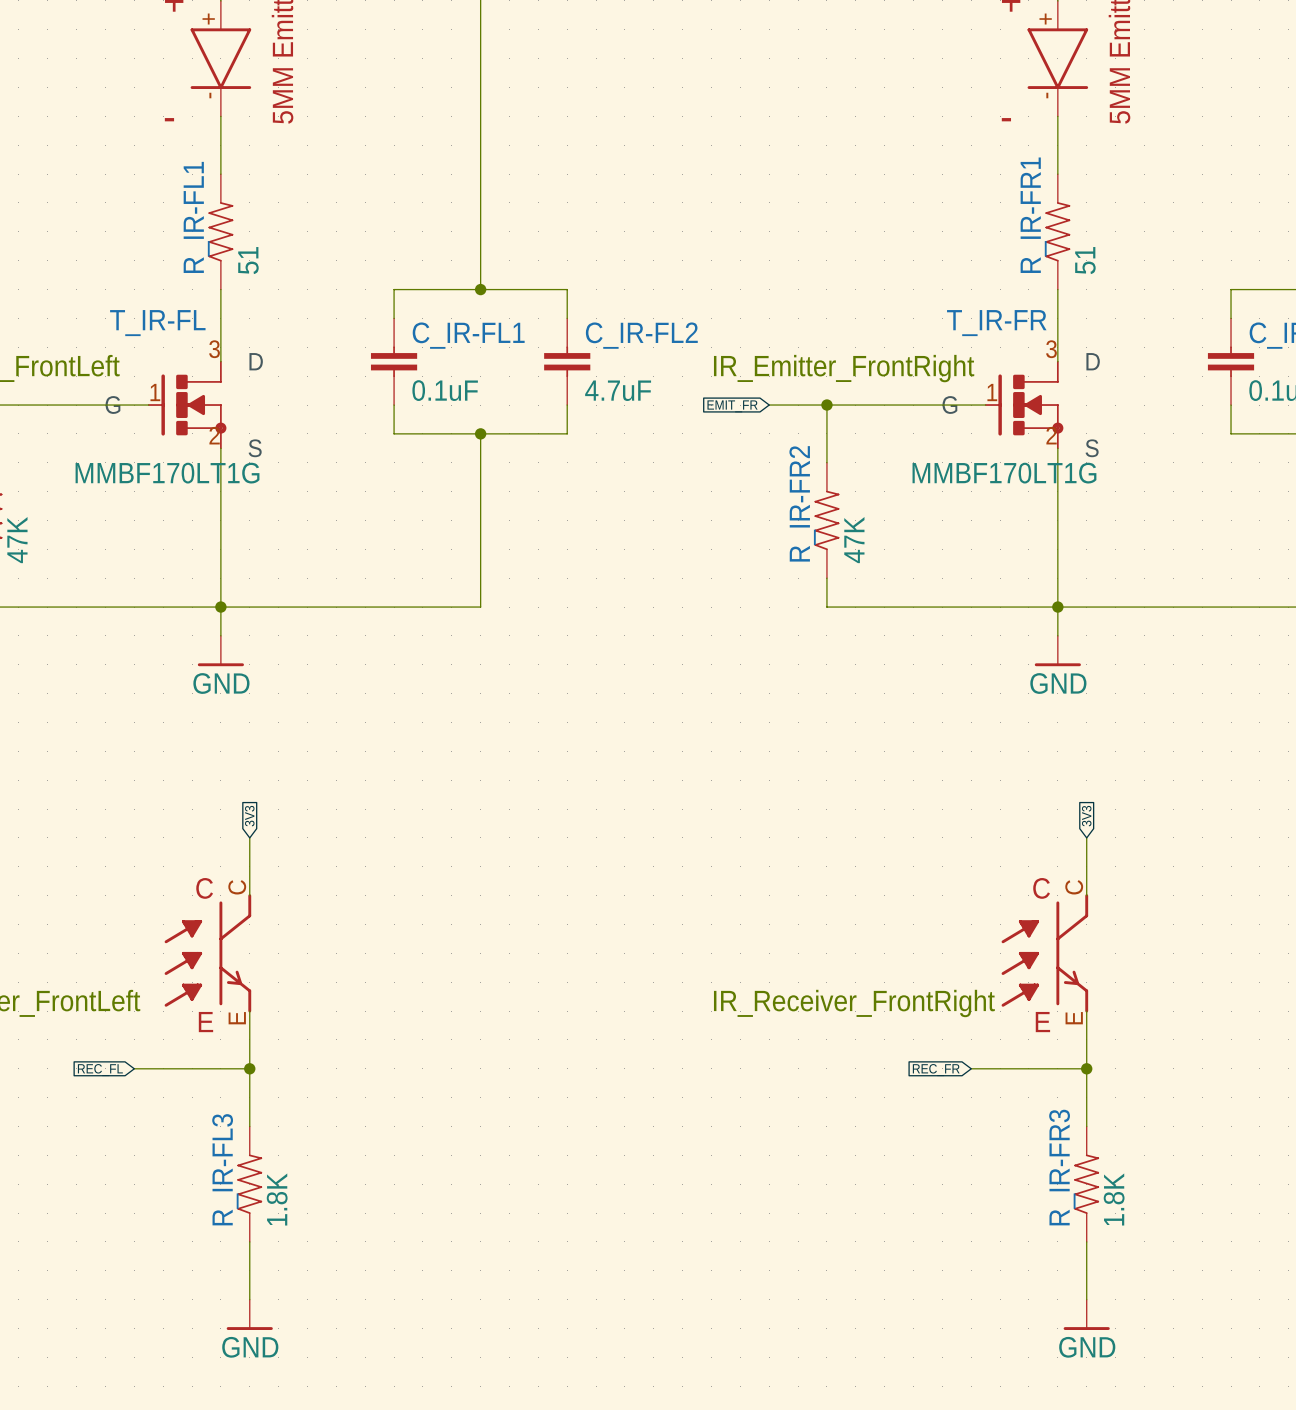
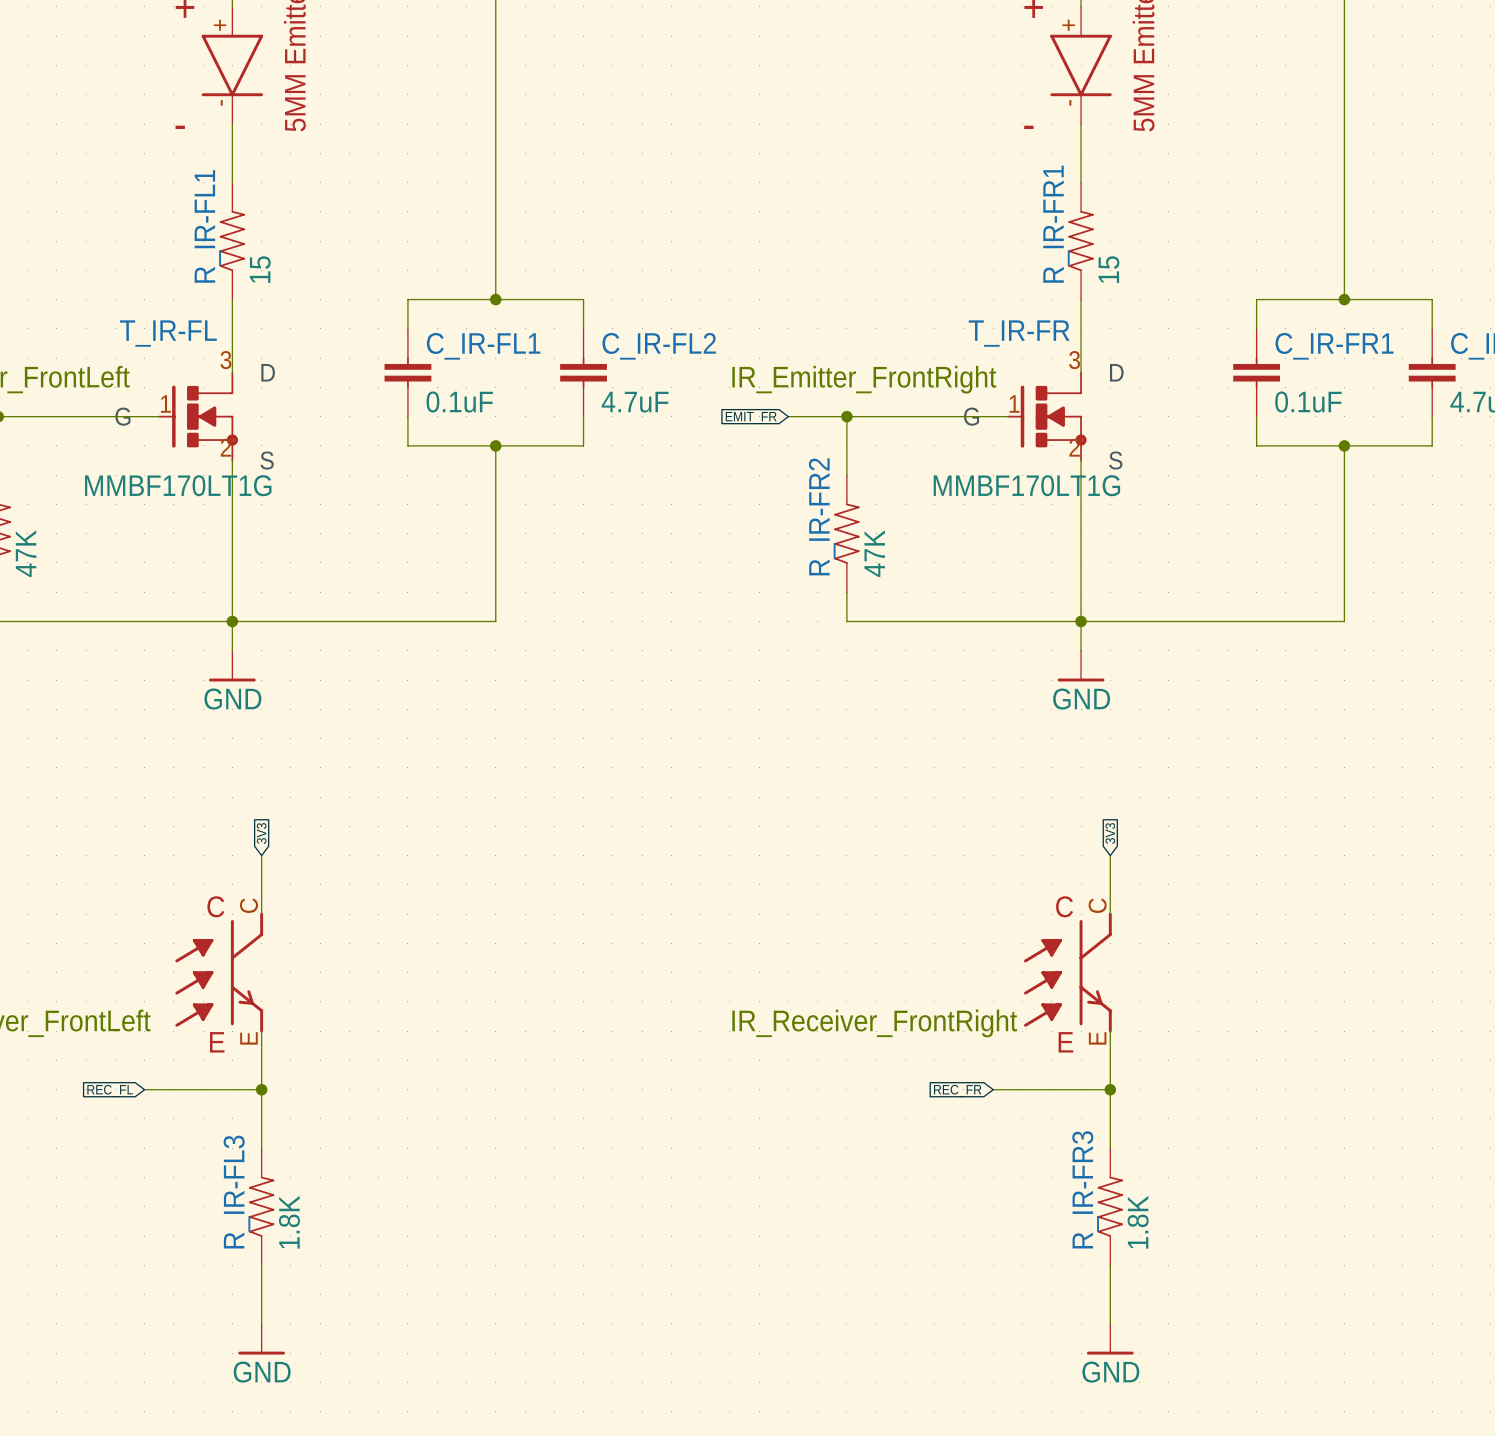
R_IR-FL1 value: 51 (248, 260) -> 15 (260, 269)
R_IR-FR1 value: 51 (1085, 260) -> 15 (1108, 269)

